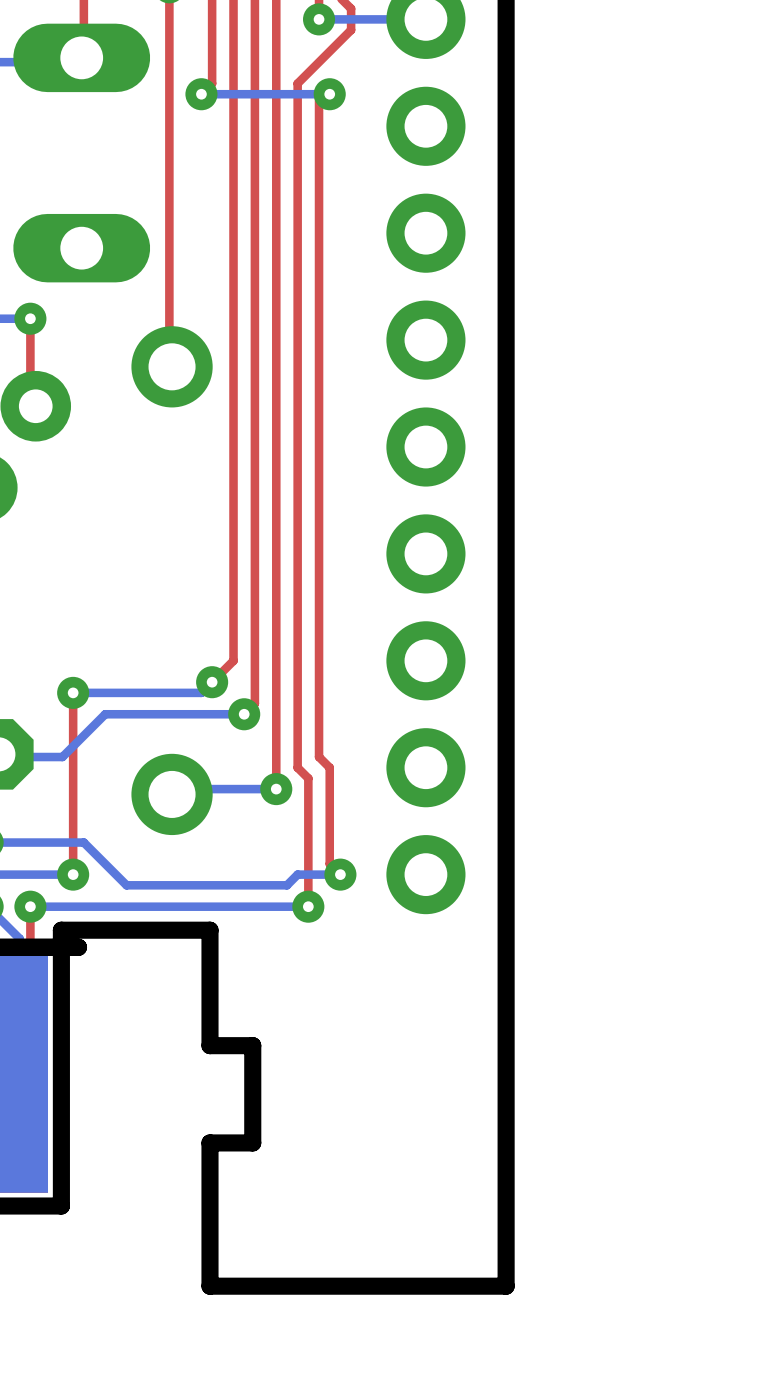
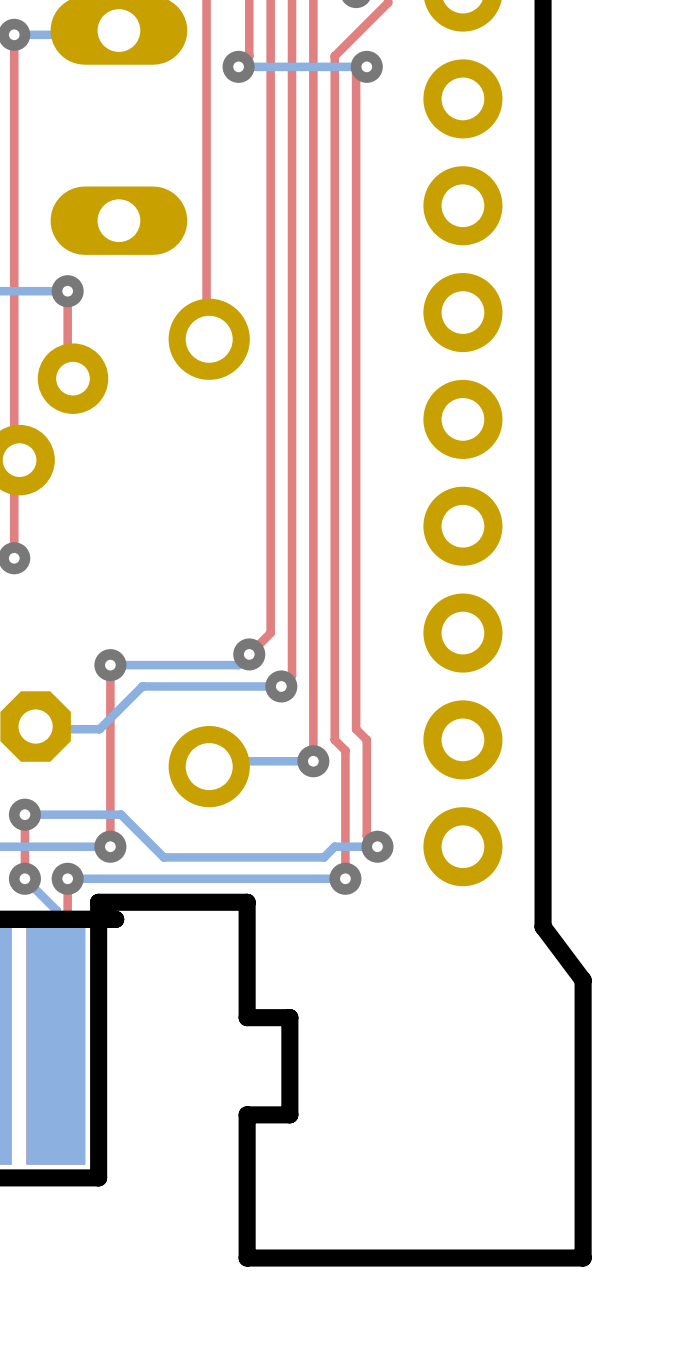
board edge: (506, 954) (506, 1286) -> (543, 926) (583, 980) (583, 1258) (543, 1258)

